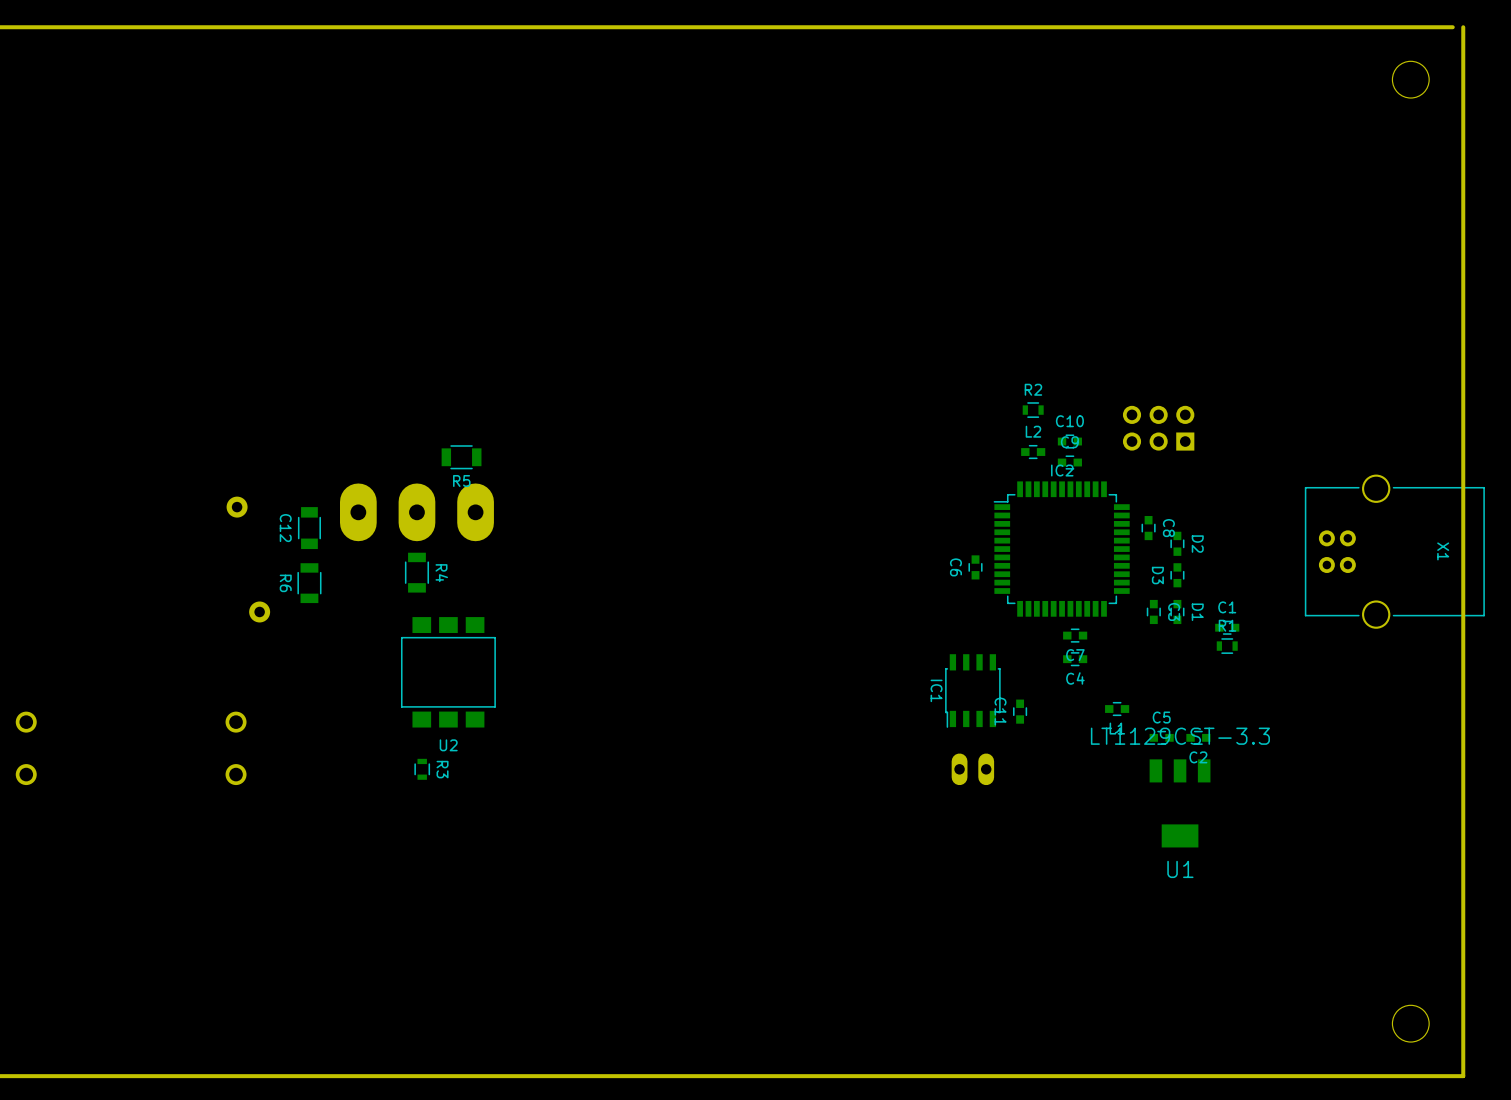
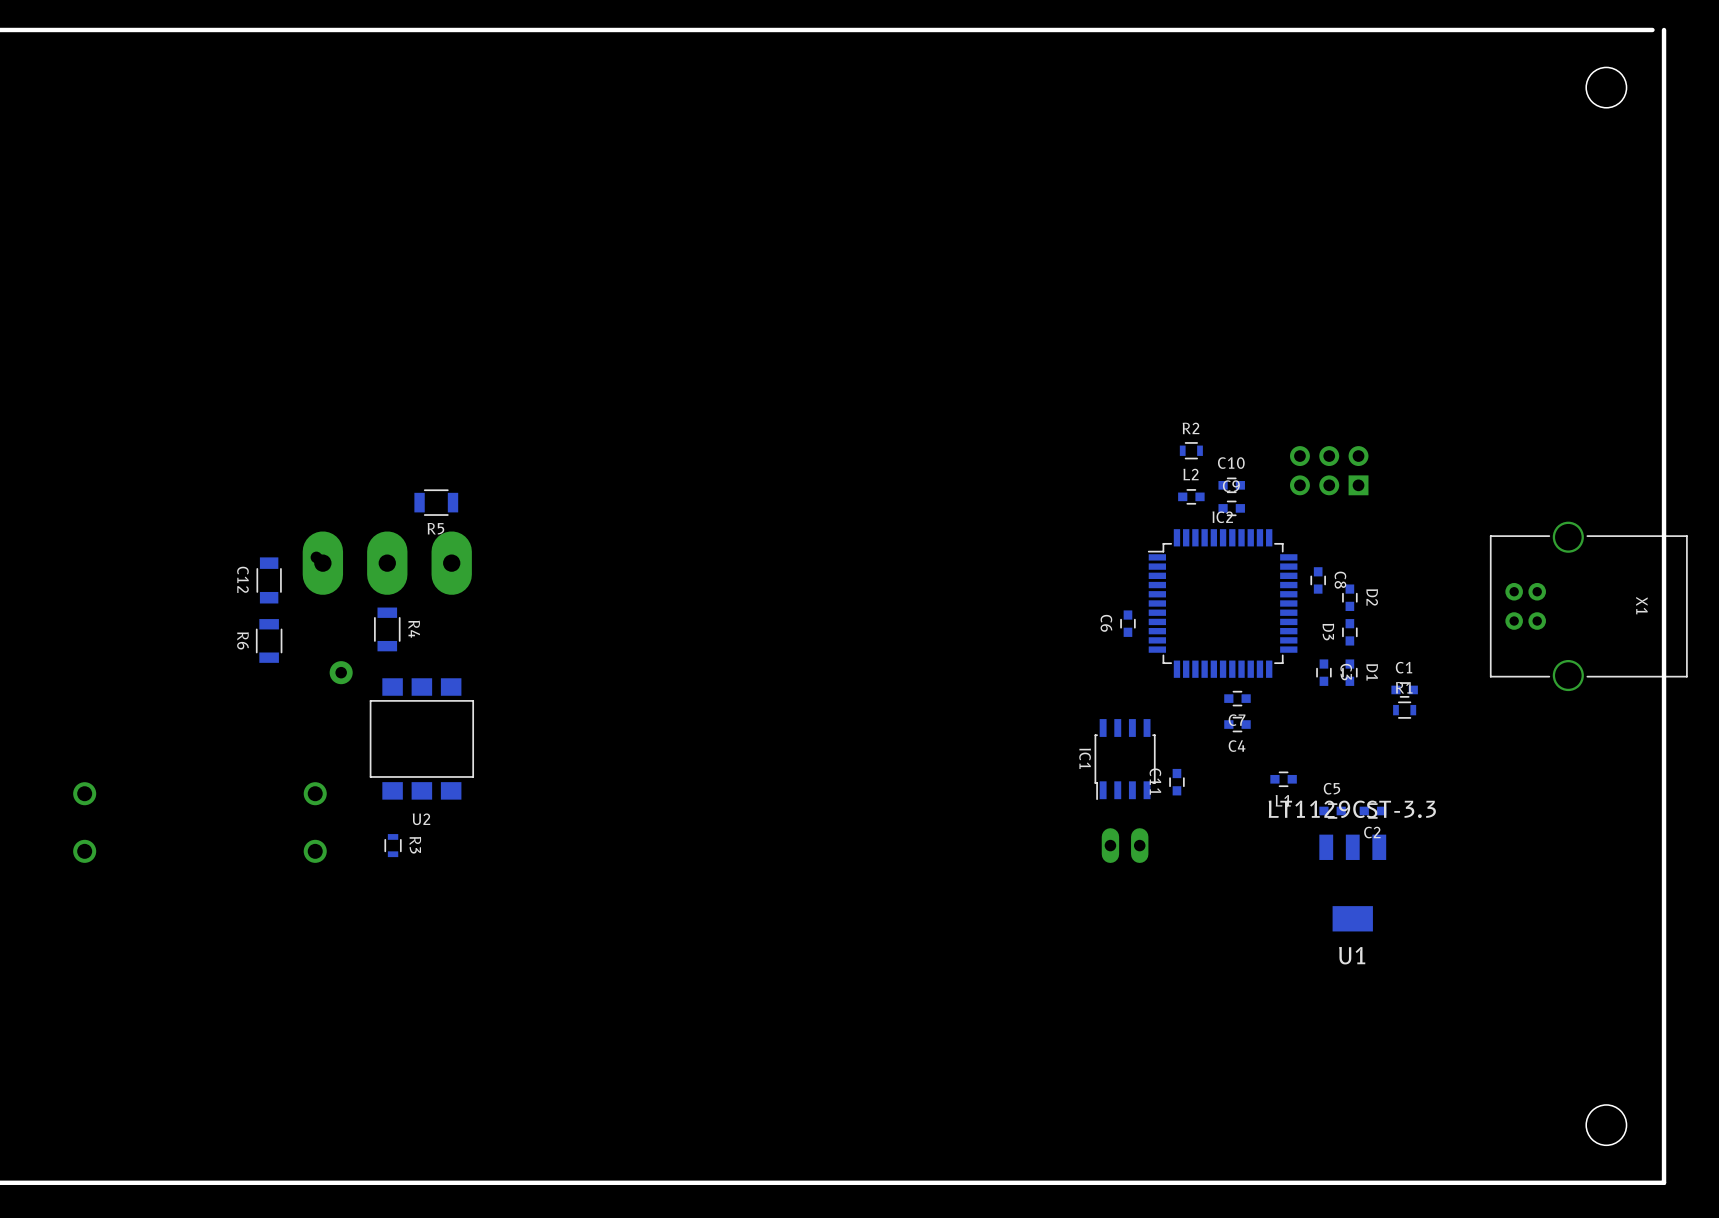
R5 position: (461, 457) -> (436, 502)
part position: (416, 512) -> (387, 563)
C12 position: (309, 528) -> (269, 580)
R4 position: (416, 572) -> (387, 629)
R6 position: (309, 583) -> (269, 640)
U2 position: (448, 672) -> (421, 738)
R3 position: (422, 769) -> (393, 845)

